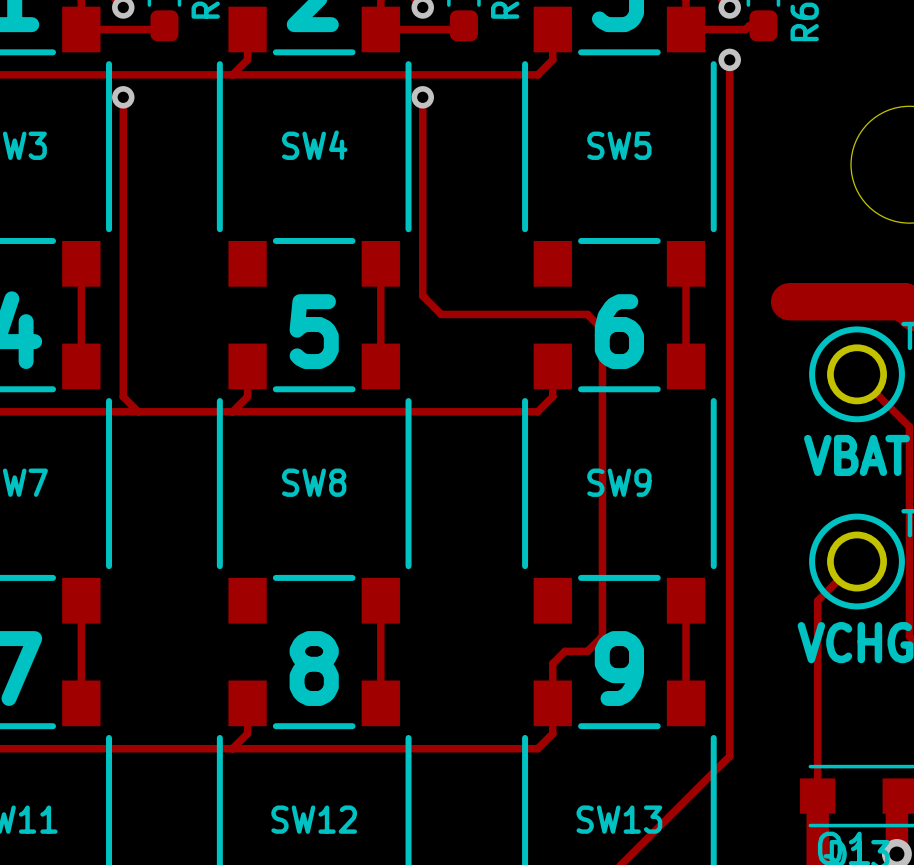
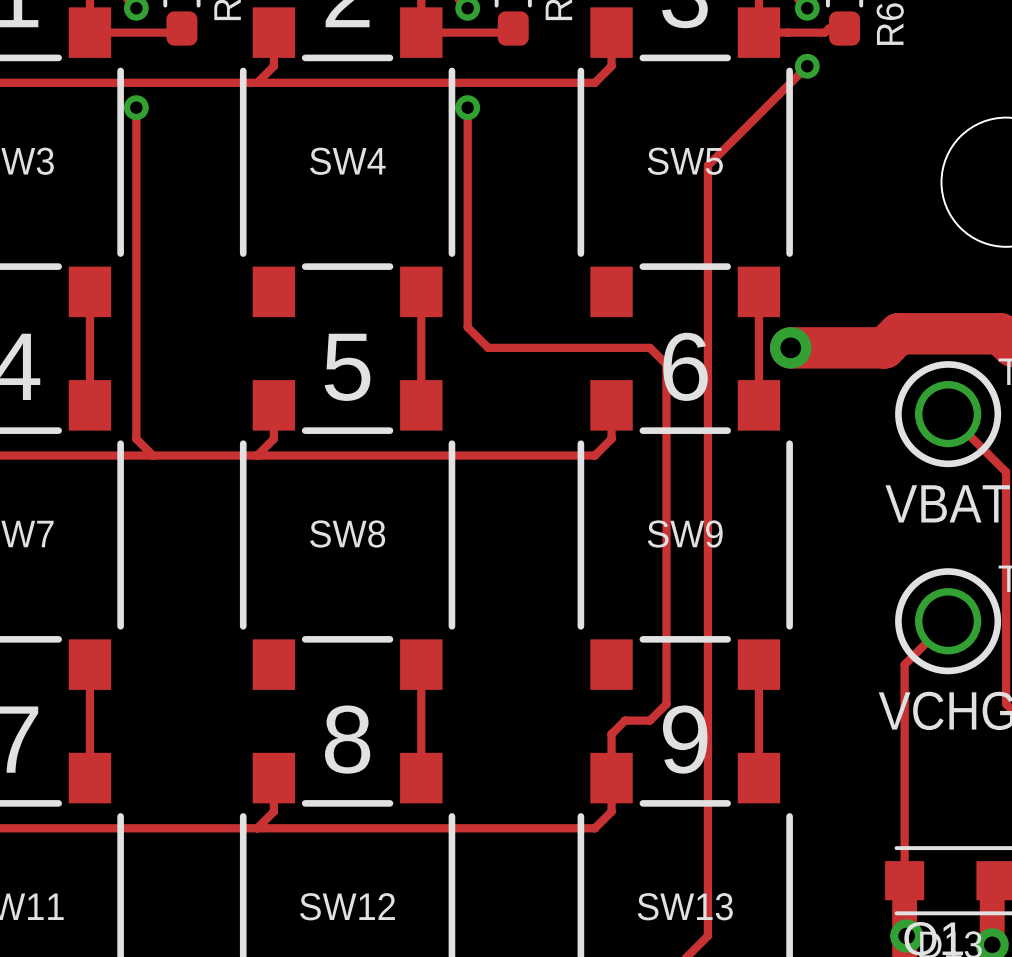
track: (729, 59) (729, 756) (639, 846) -> (807, 66) (707, 165) (707, 935)
track: (789, 301) (812, 301) -> (790, 347) (884, 347) (898, 333)
via: none -> (790, 347)
via: none -> (906, 935)

